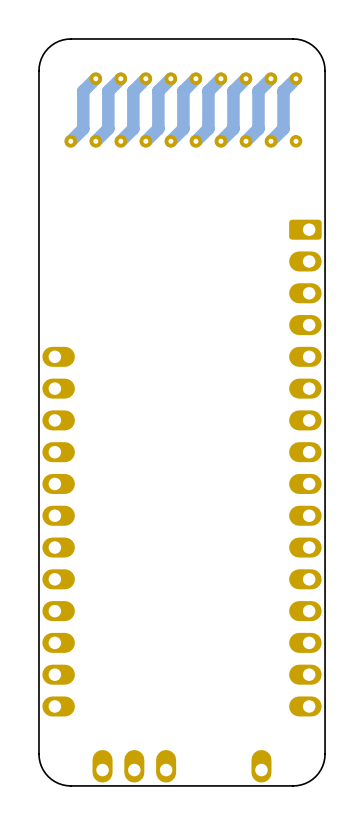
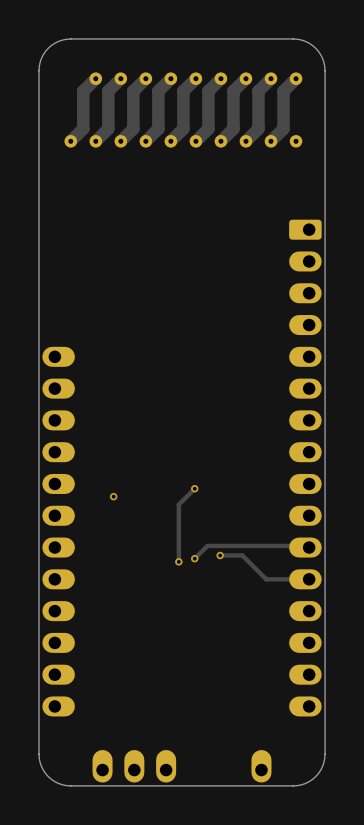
track: none -> (194, 488) (178, 504) (178, 561)
via: none -> (194, 488)
via: none -> (113, 496)
track: none -> (309, 547) (307, 545) (207, 545) (194, 558)
track: none -> (220, 555) (242, 555) (266, 579) (309, 579)
via: none -> (220, 555)
via: none -> (194, 558)
via: none -> (178, 561)

